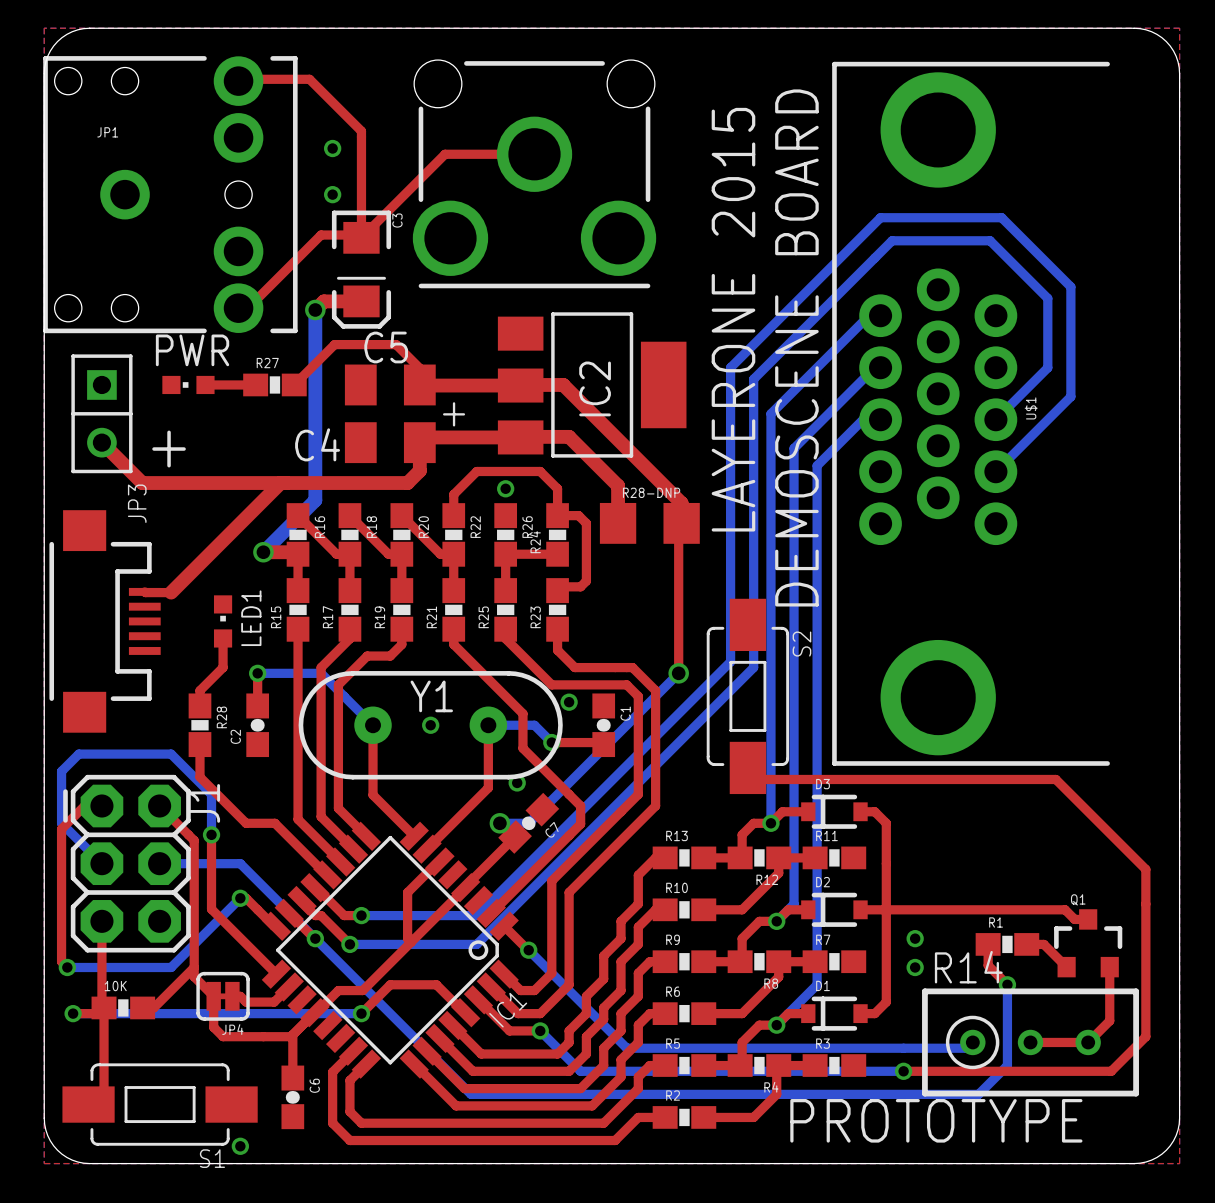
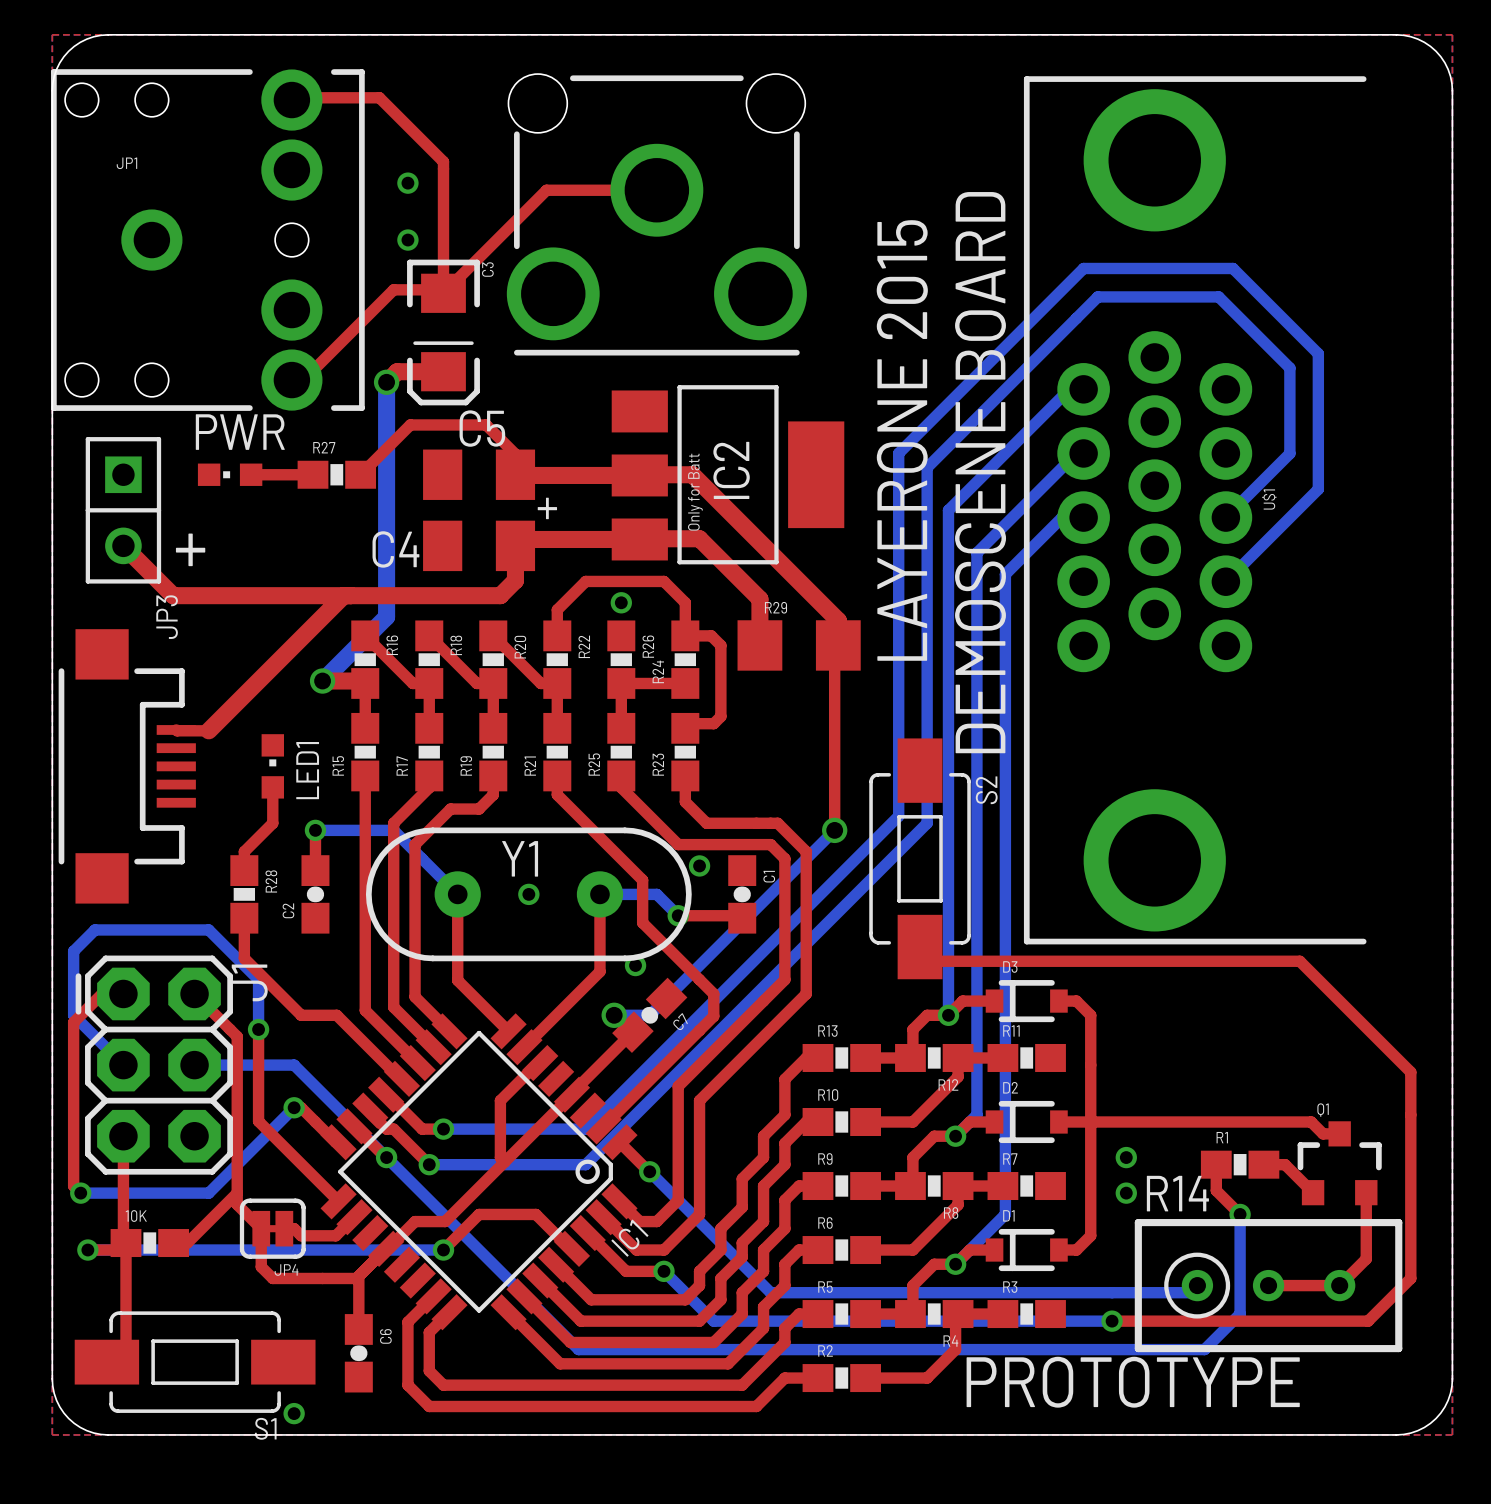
text: none -> Only for Batt (695, 492)
R28-DNP name: R28-DNP (651, 492) -> R29 (775, 607)

